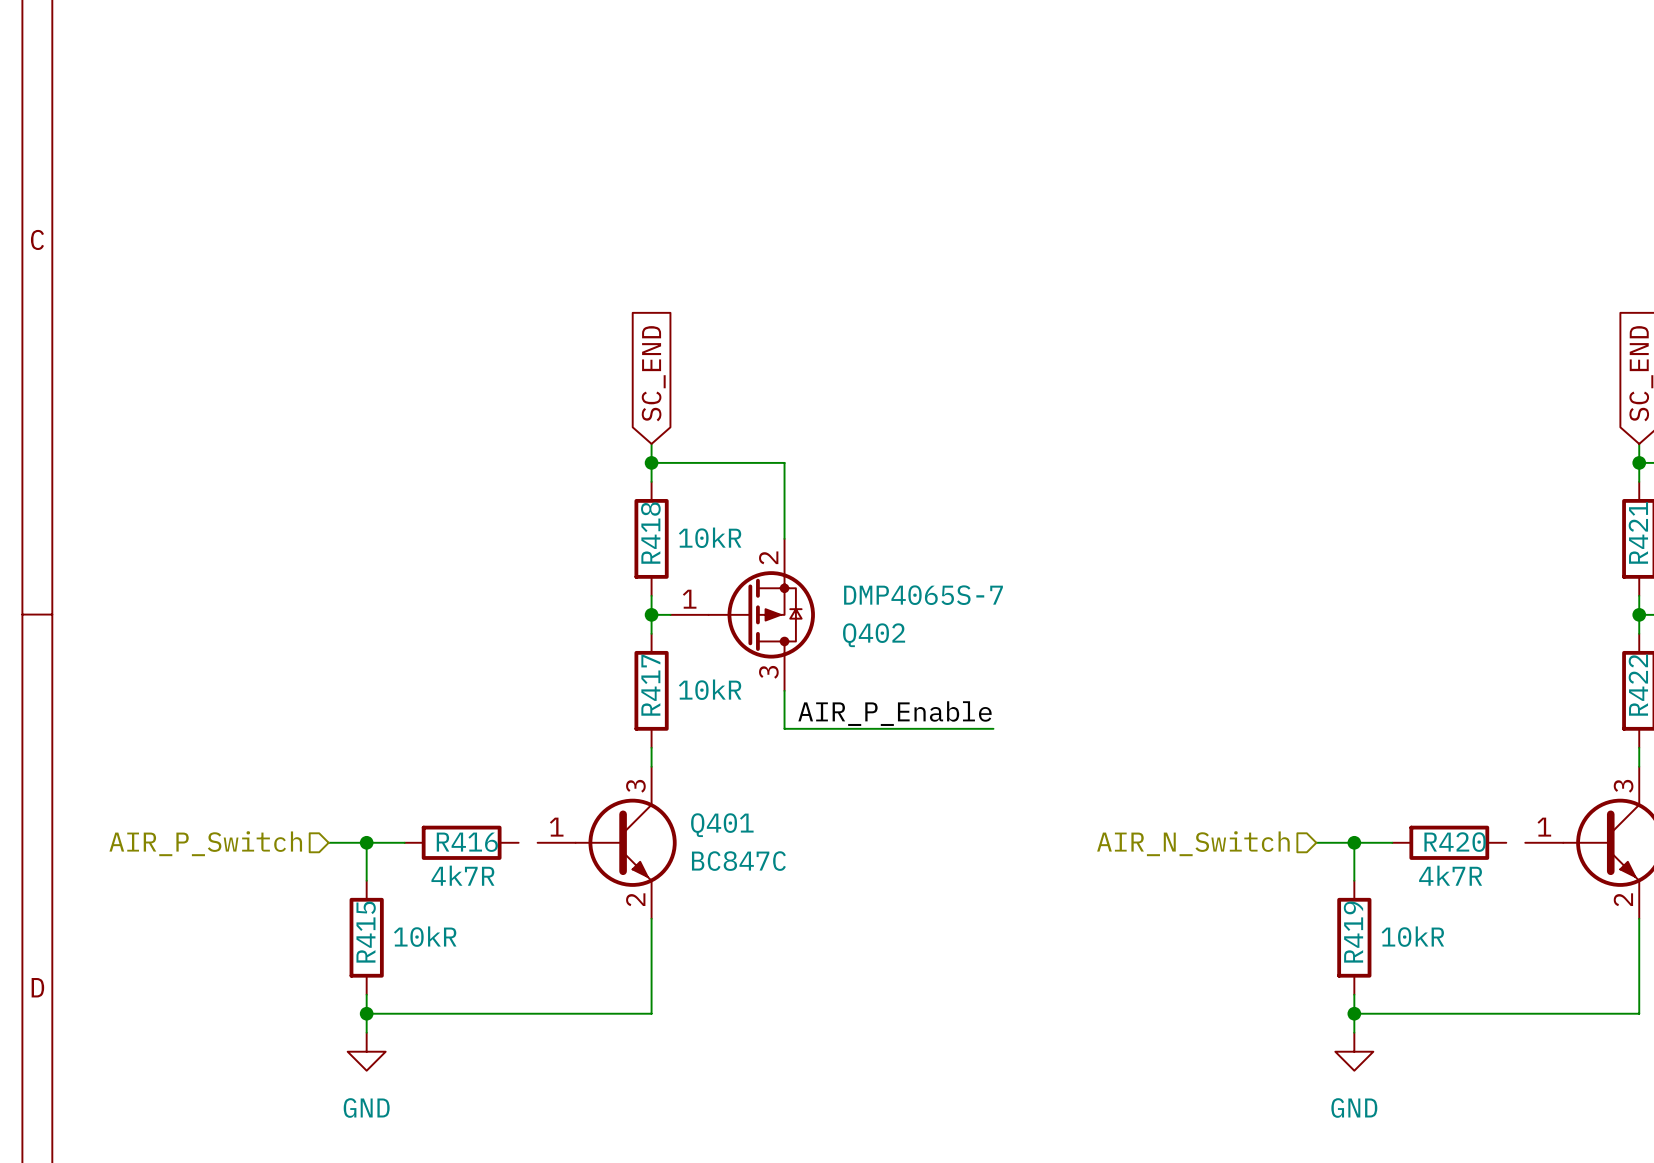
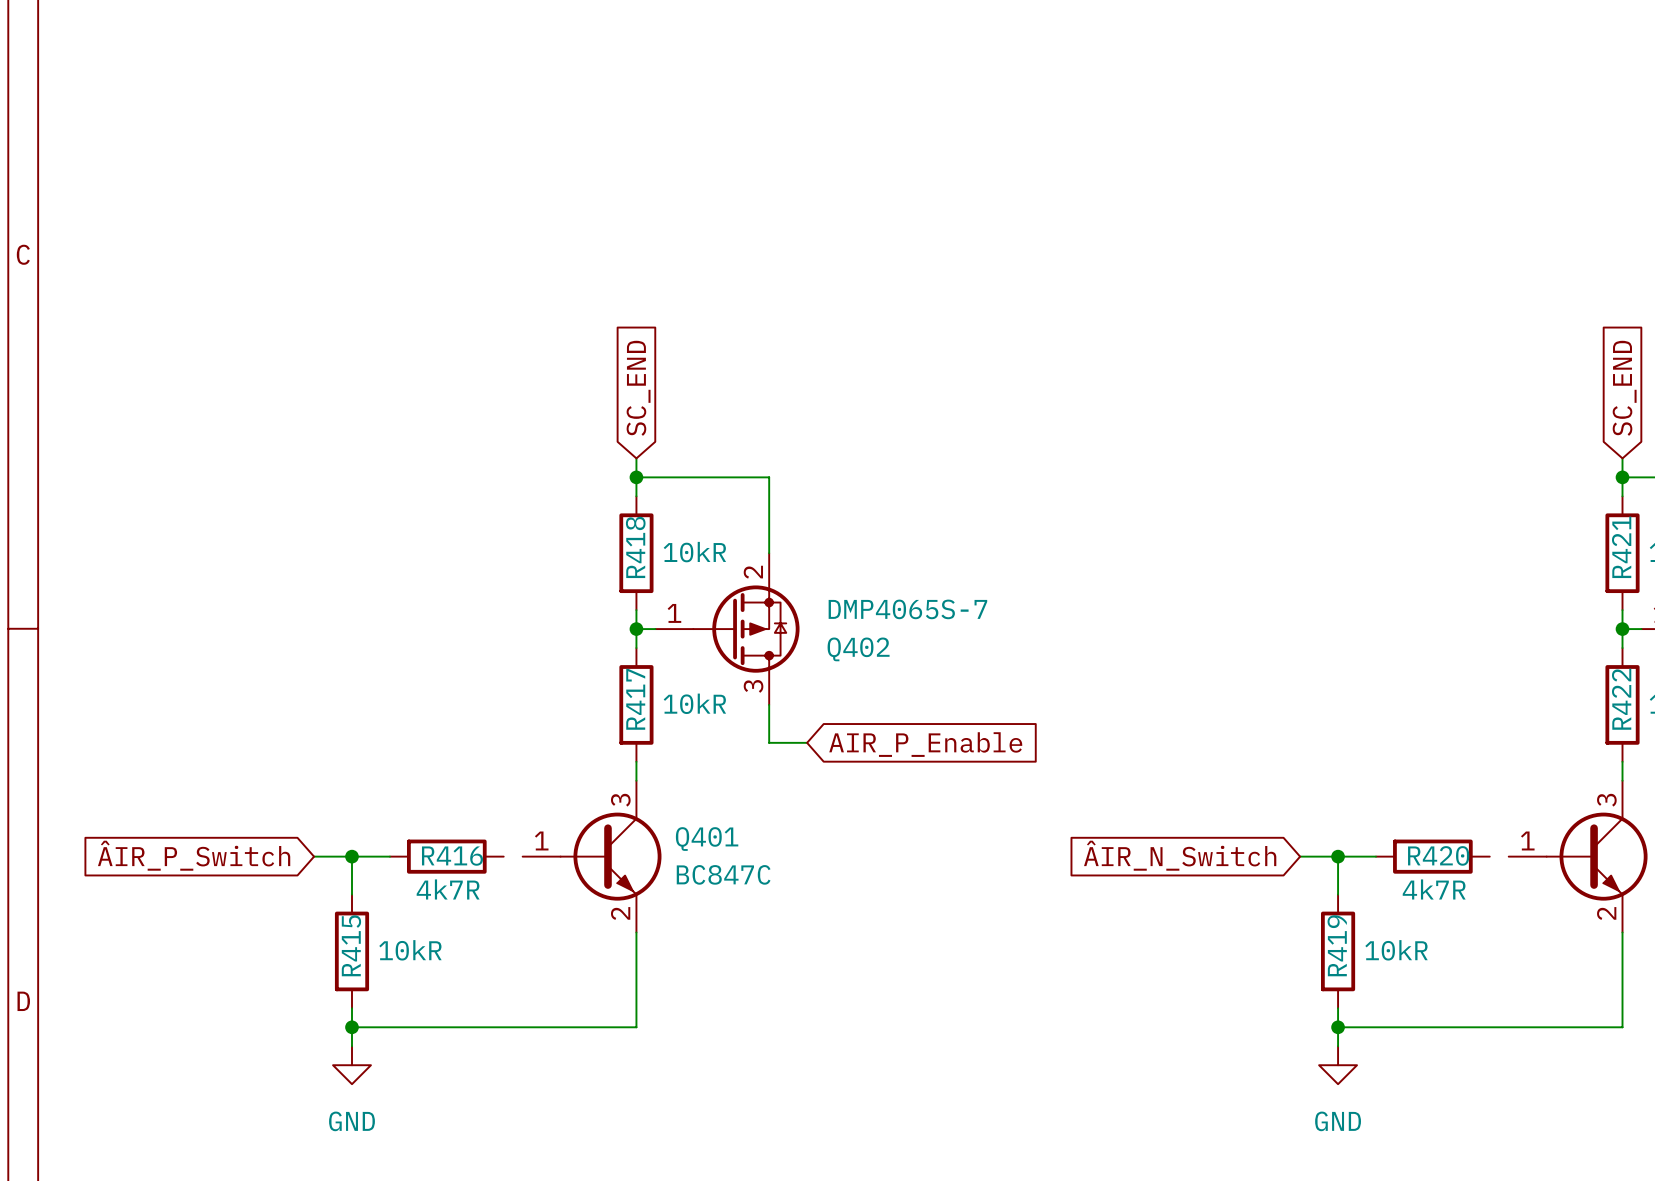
label: AIR_P_Enable (895, 713) -> none
wire: (822, 728) (993, 728) -> none
global label: none -> AIR_P_Enable (925, 744)
global label: none -> ÂIR_P_Switch (194, 855)
global label: none -> ÂIR_N_Switch (1180, 855)
hierarchical label: AIR_P_Switch (205, 843) -> none
hierarchical label: AIR_N_Switch (1193, 843) -> none

